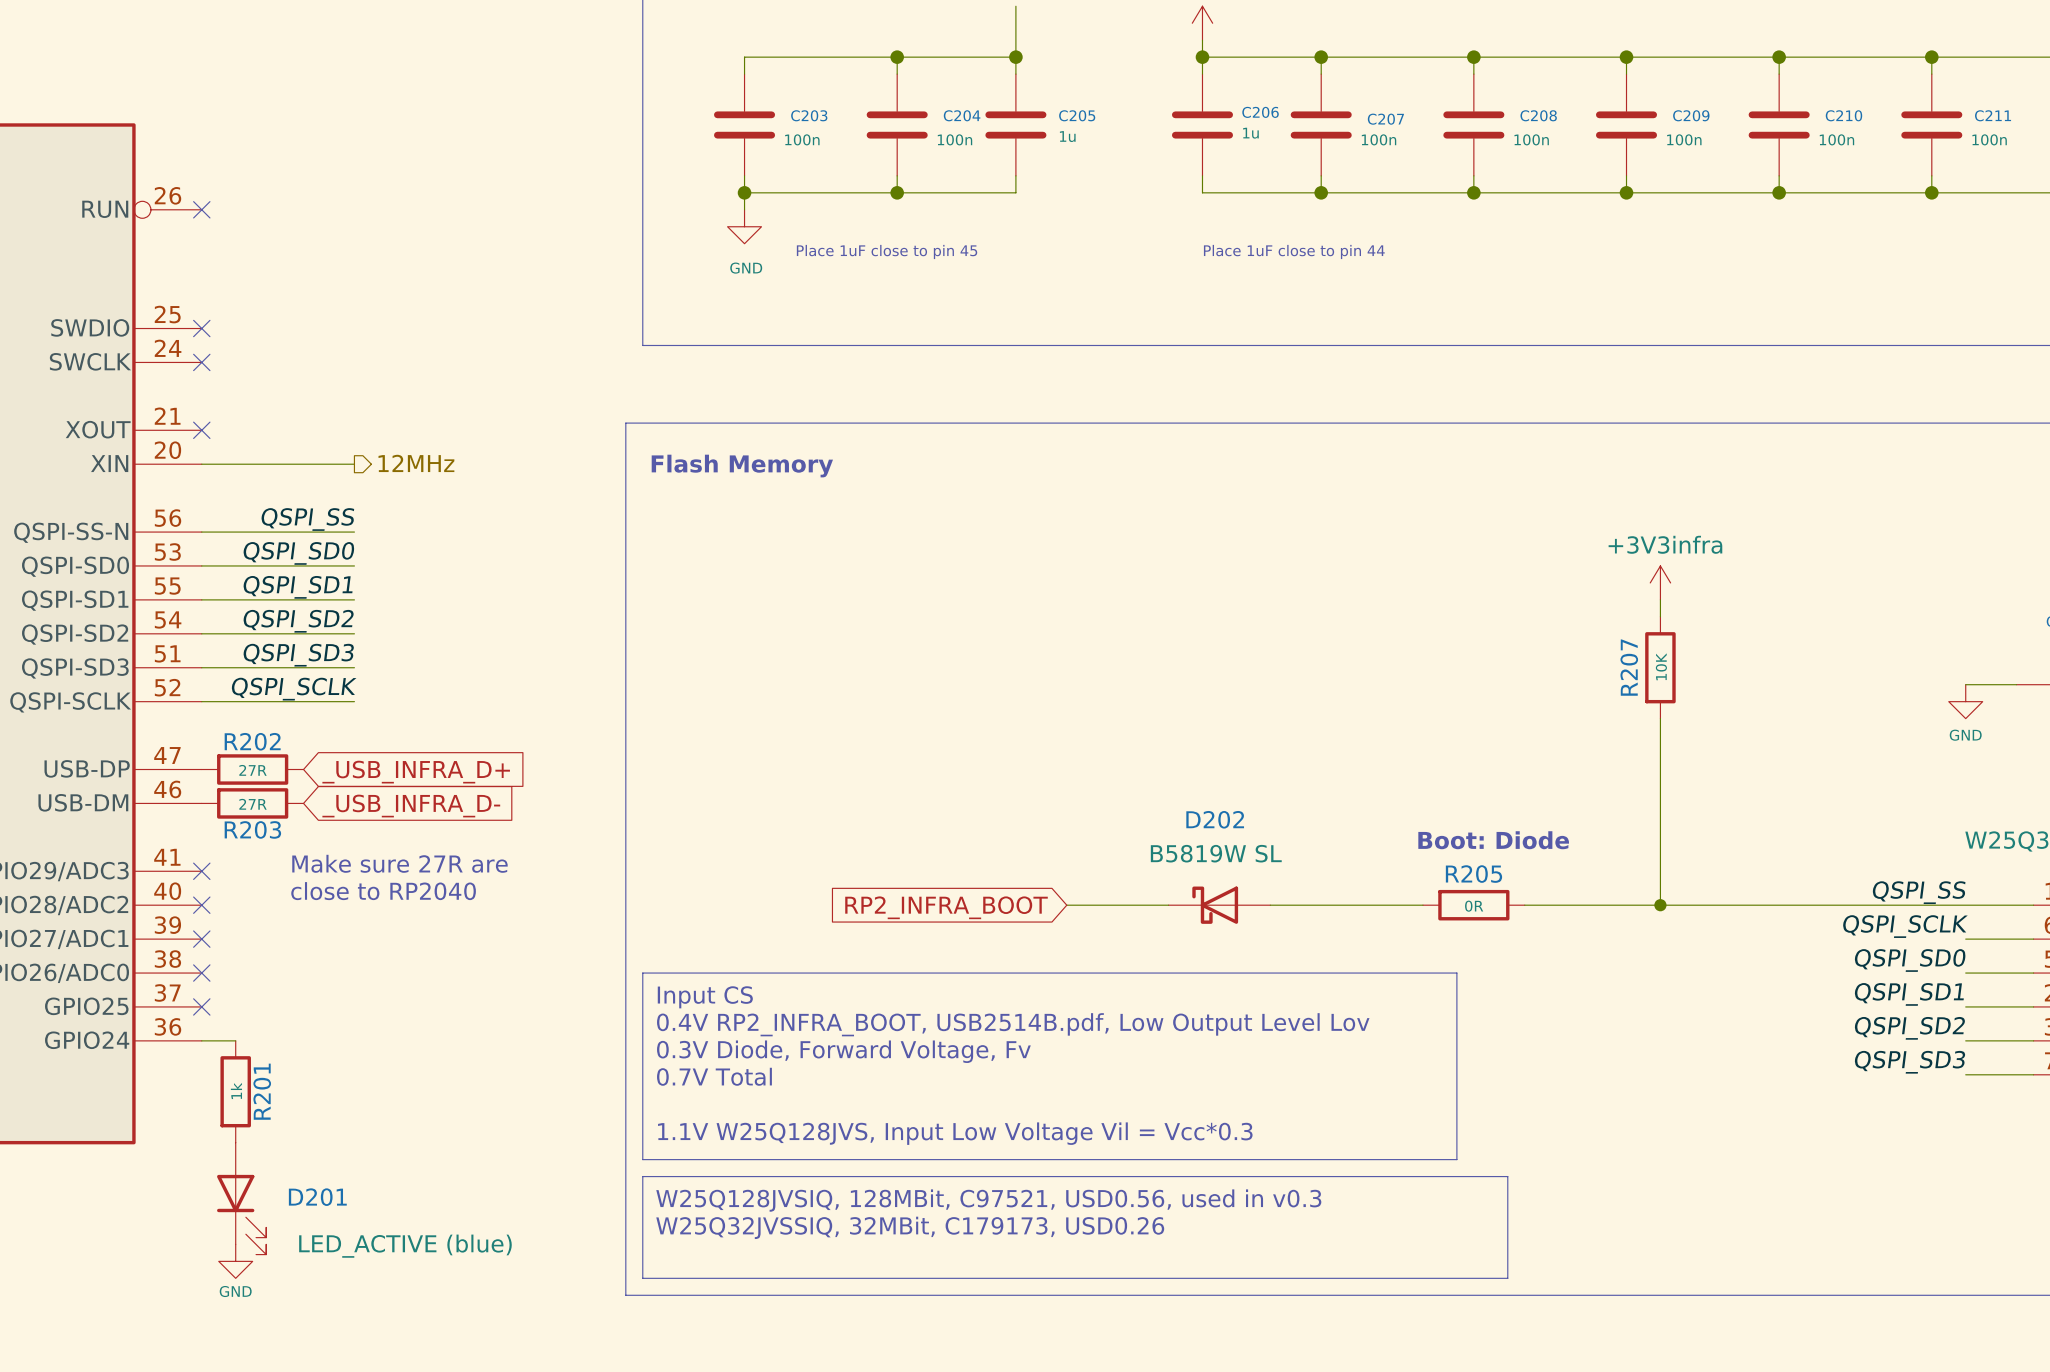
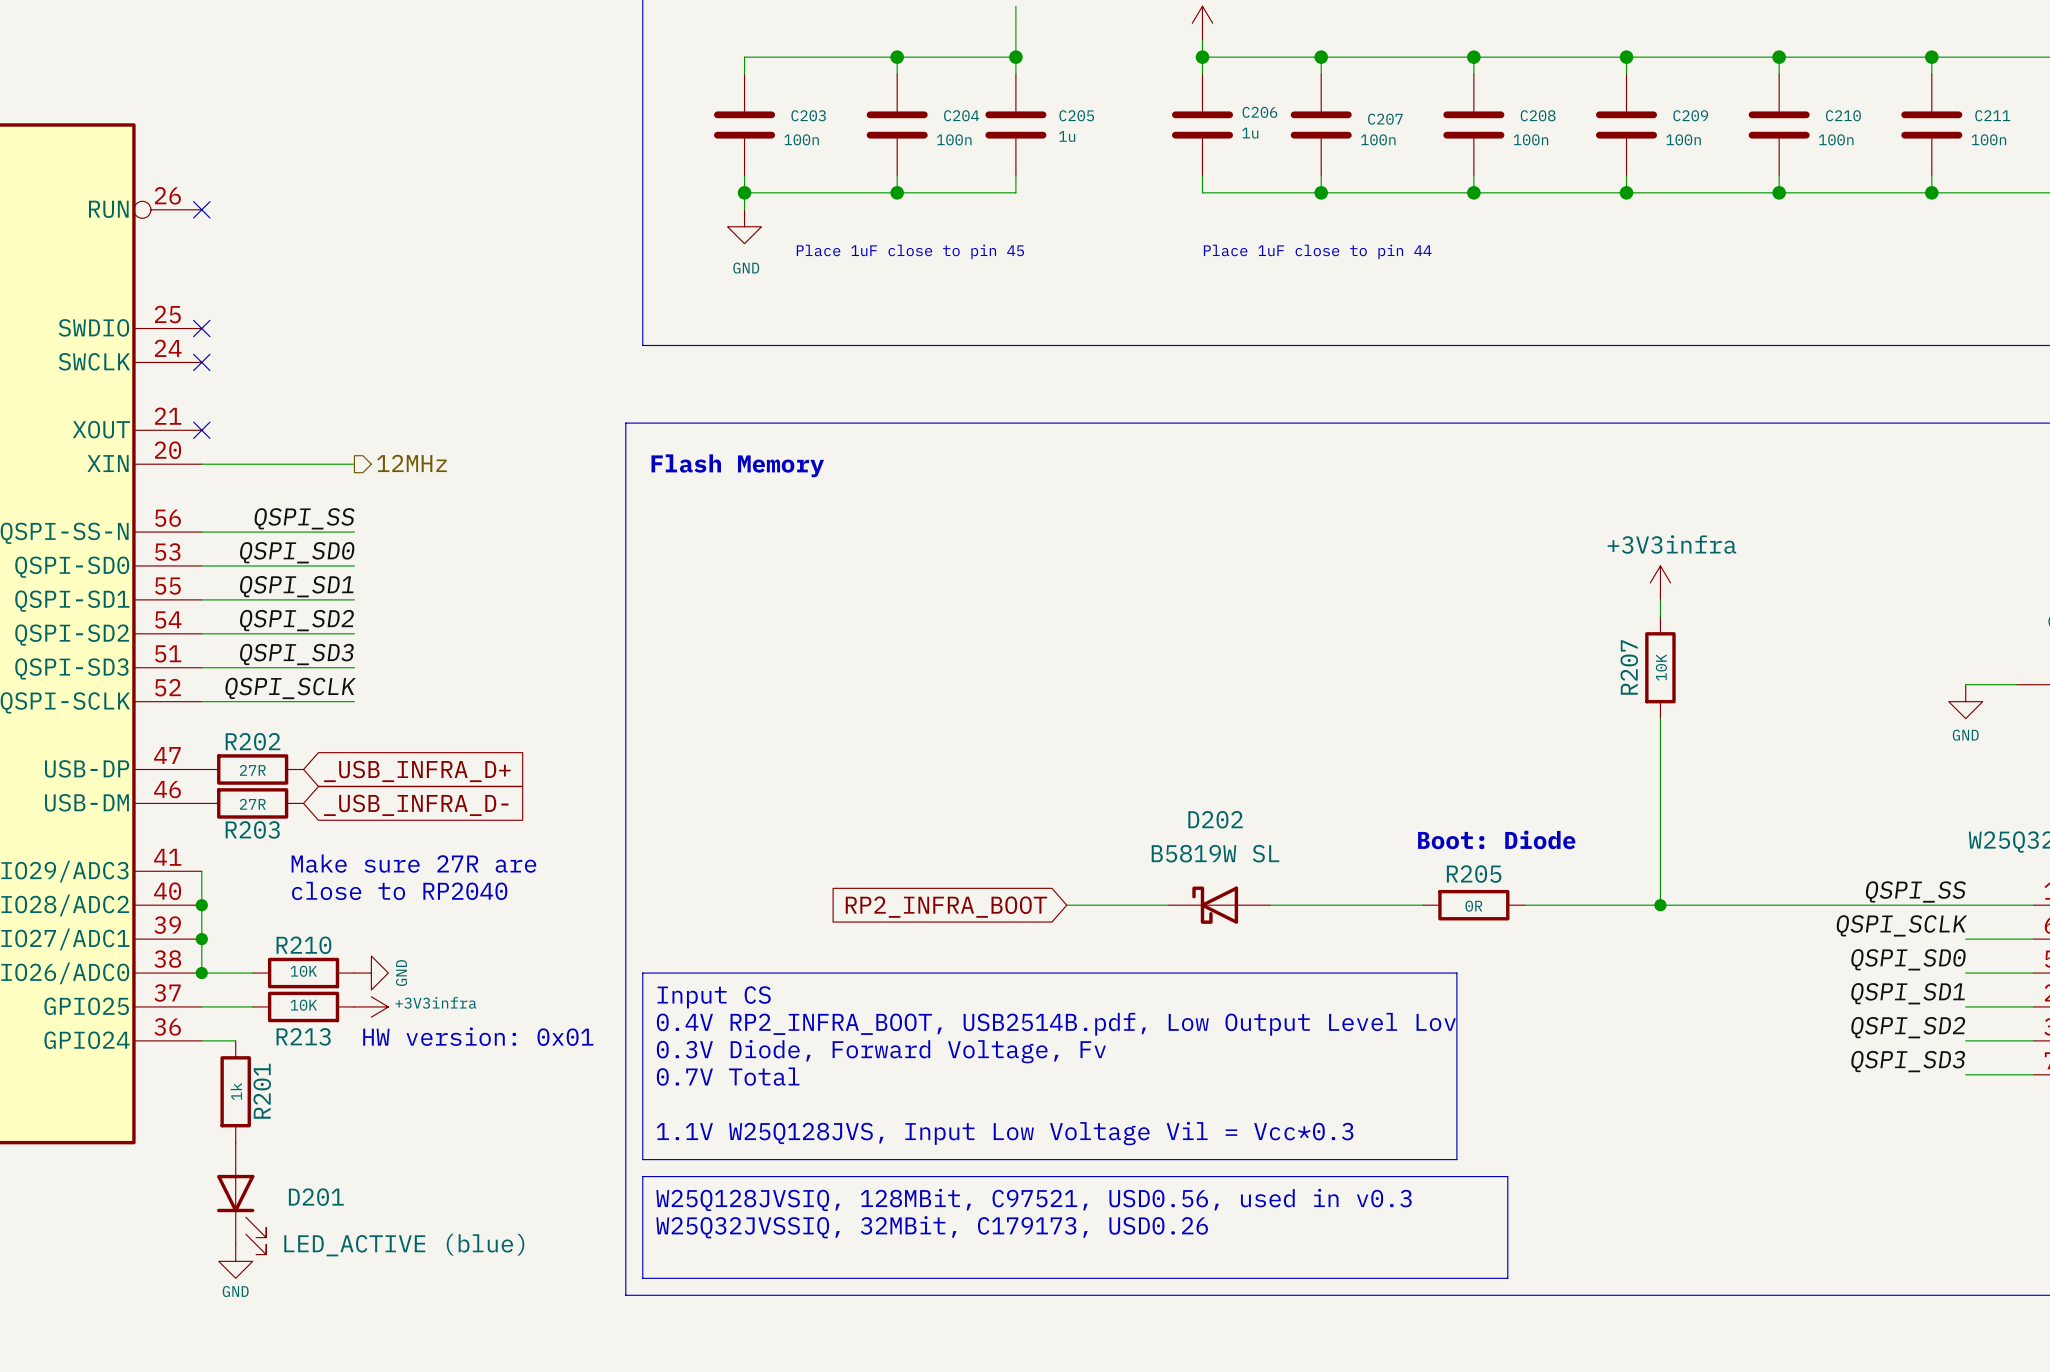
wire: none -> (201, 871) (201, 973) (252, 973)
no-connect mark: (201, 871) -> none
no-connect mark: (201, 905) -> none
junction: none -> (201, 905)
no-connect mark: (201, 939) -> none
junction: none -> (201, 939)
no-connect mark: (201, 973) -> none
junction: none -> (201, 973)
R210: none -> 10K (303, 973)
power symbol: none -> GND (371, 973)
wire: none -> (201, 1006) (252, 1006)
no-connect mark: (201, 1006) -> none
R213: none -> 10K (303, 1006)
power symbol: none -> +3V3infra (371, 1006)
text: none -> HW version: 0x01 (478, 1036)

